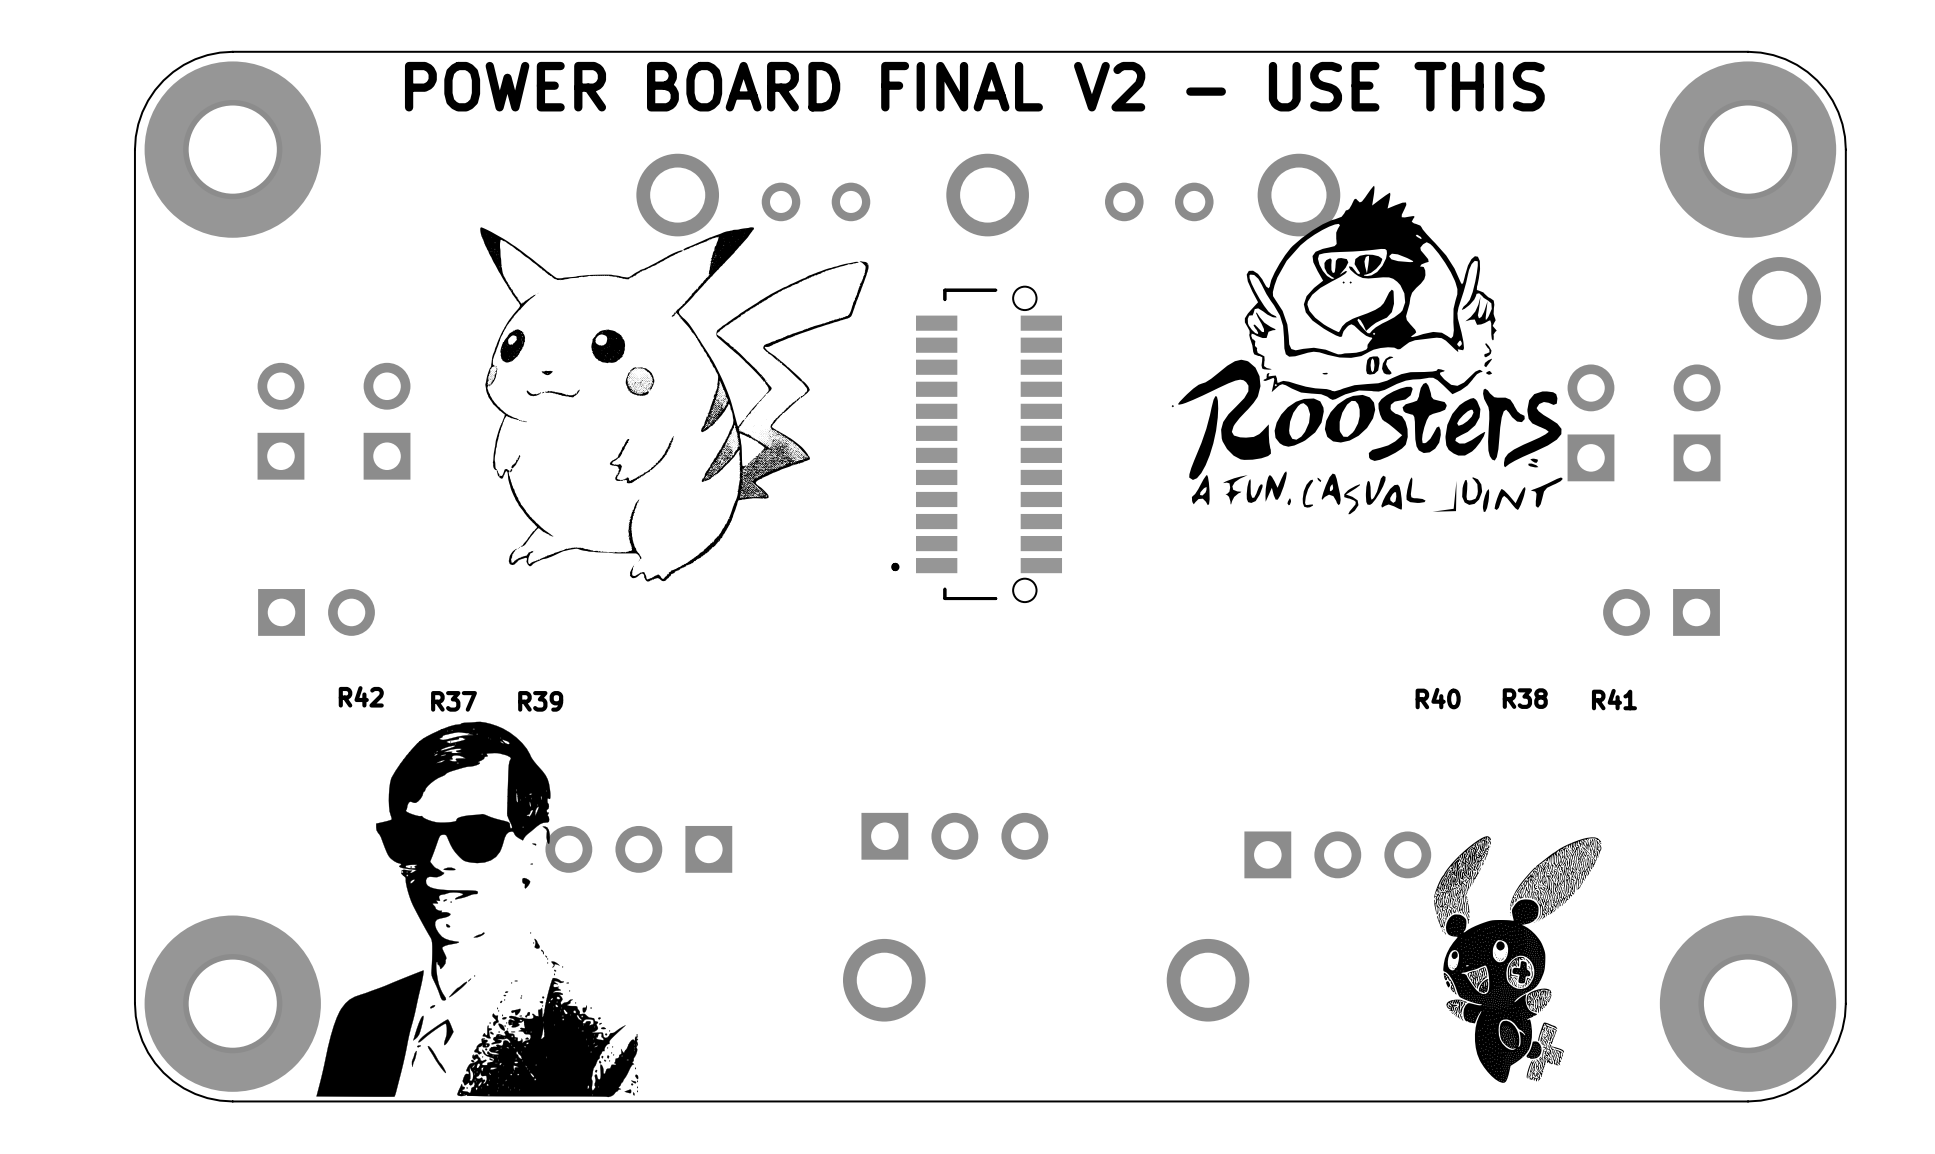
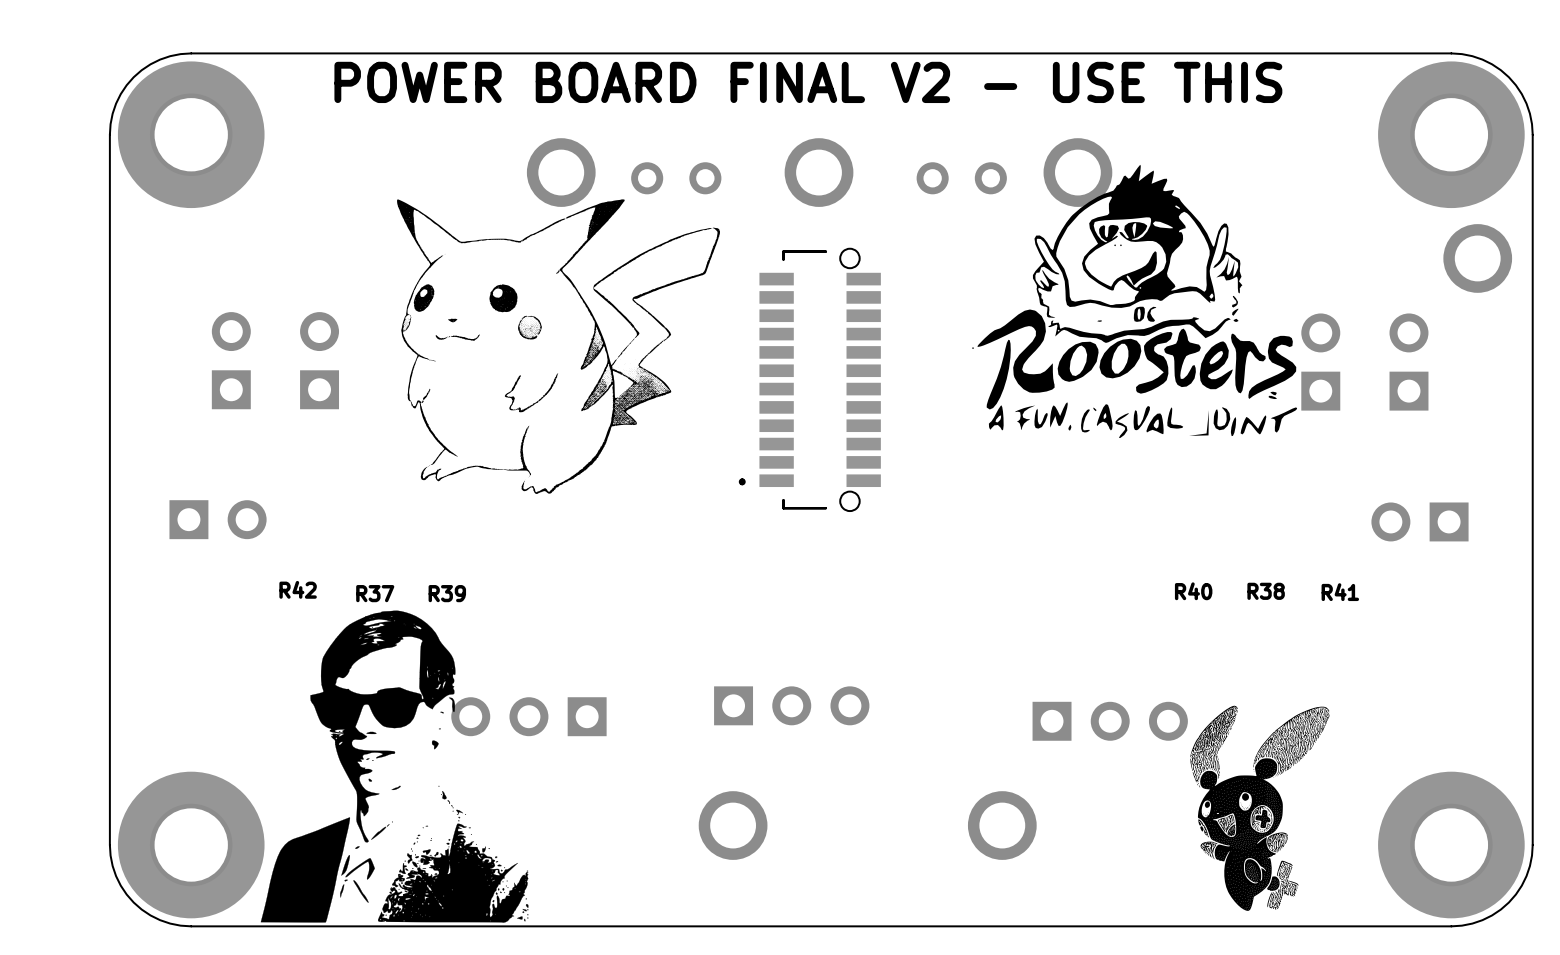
part position: (316, 612) -> (218, 519)
part position: (1661, 612) -> (1419, 521)

